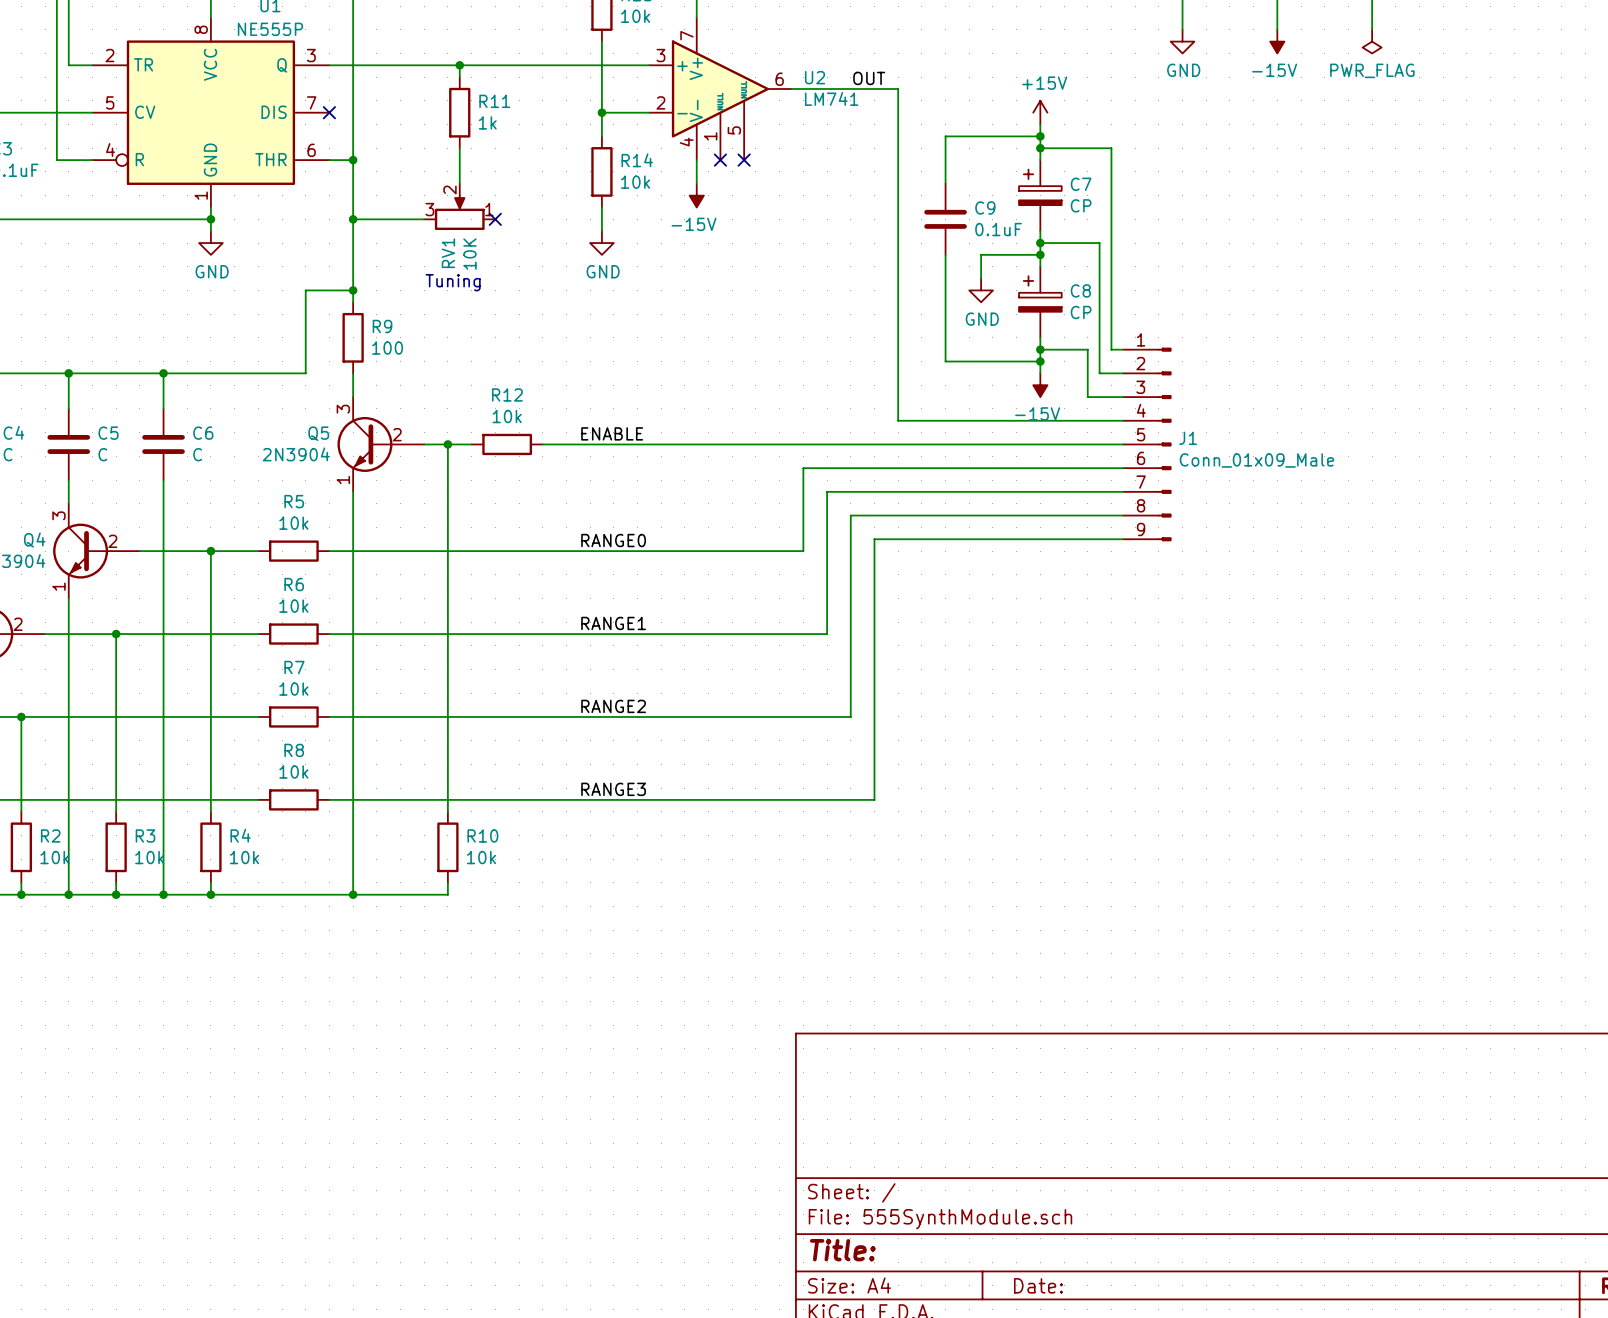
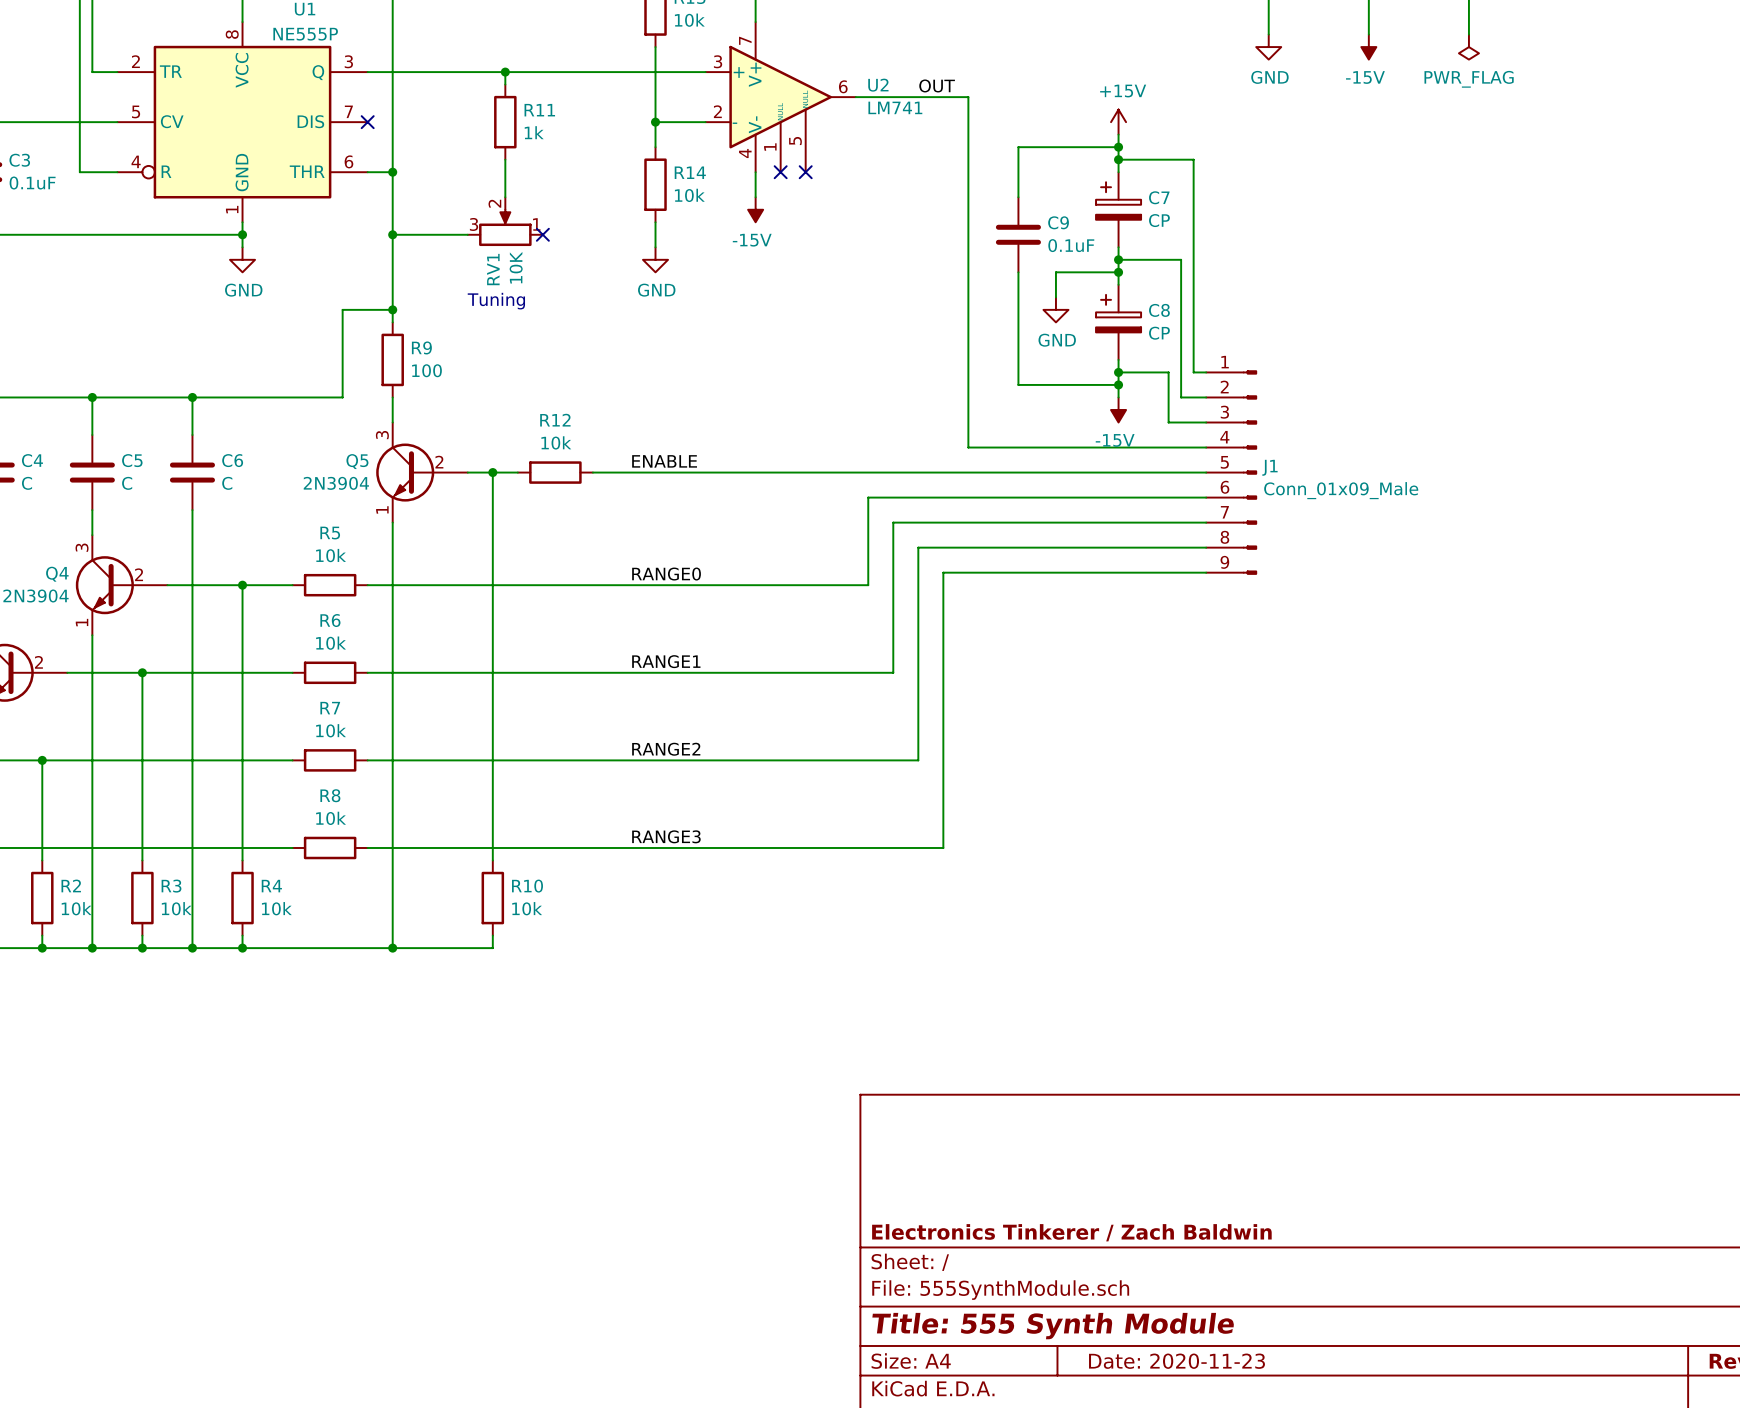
title block: none -> Electronics Tinkerer / Zach Baldwin (1071, 1232)
title block: Title: (842, 1250) -> Title: 555 Synth Module (1053, 1326)
title block: Date: (1038, 1285) -> Date: 2020-11-23 (1177, 1361)

